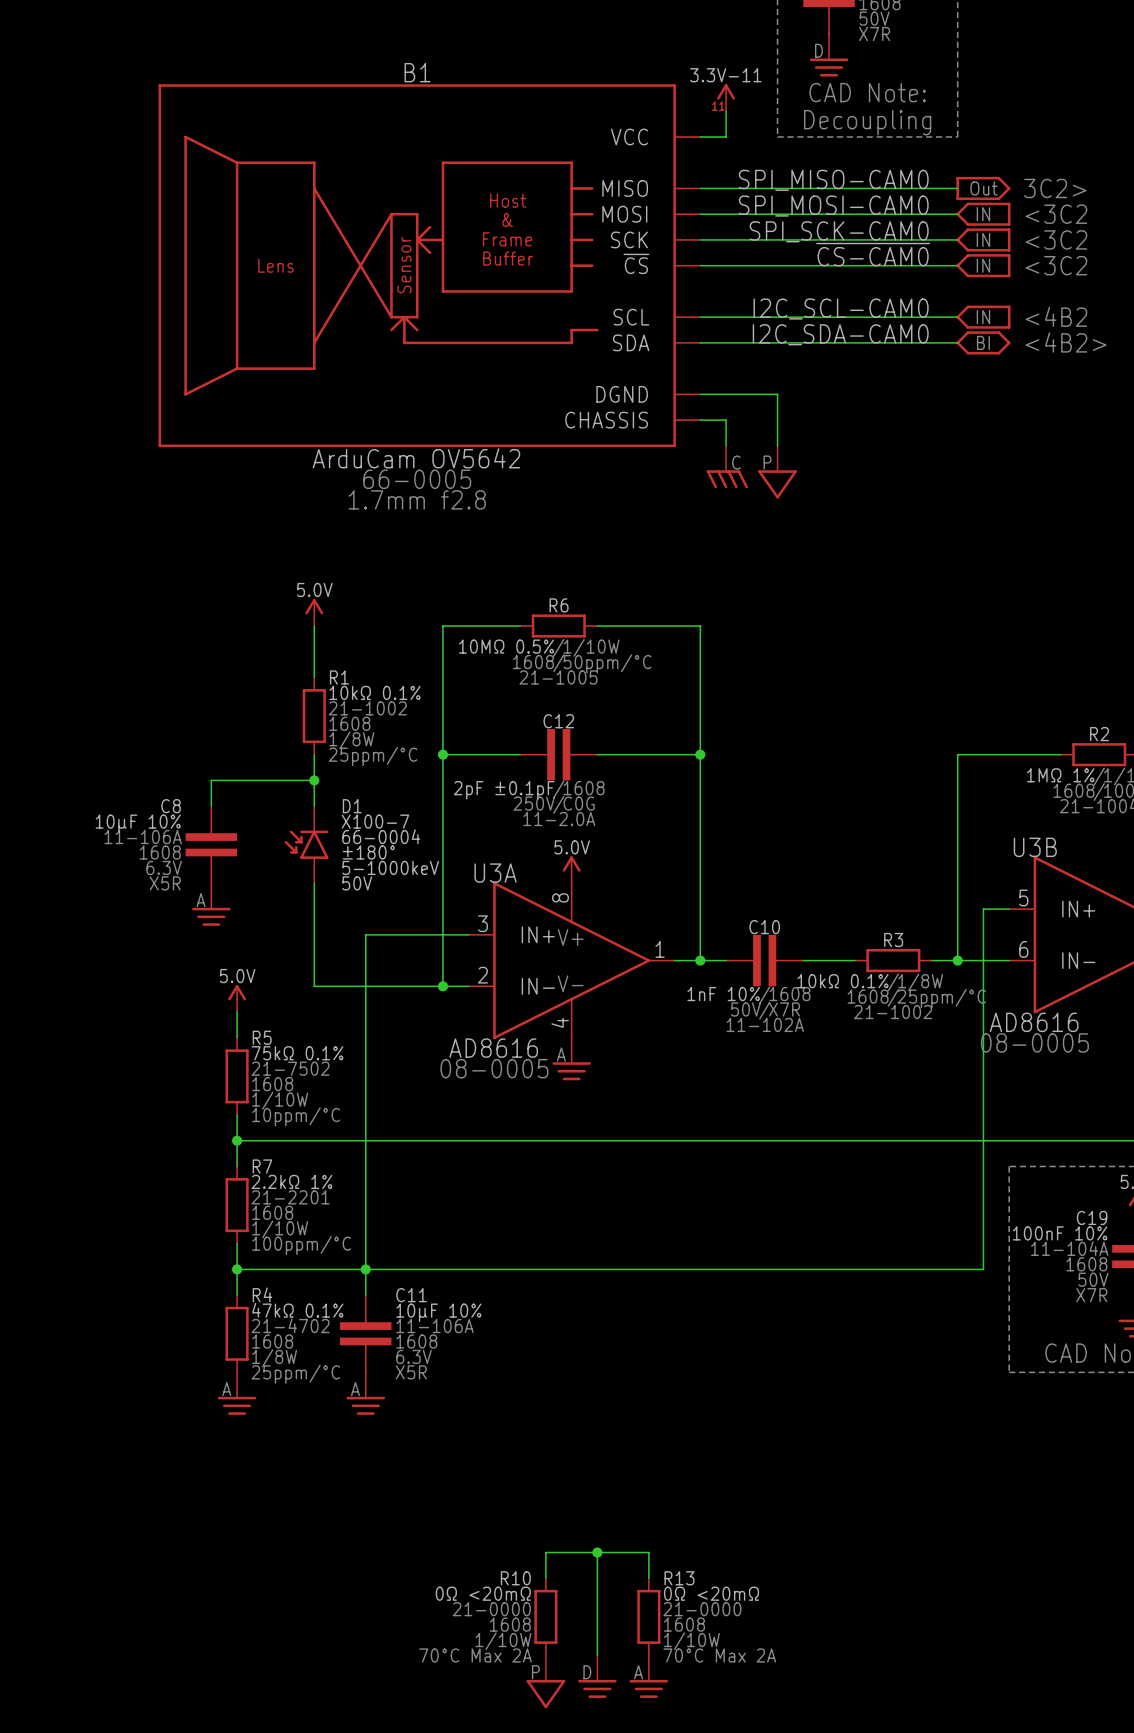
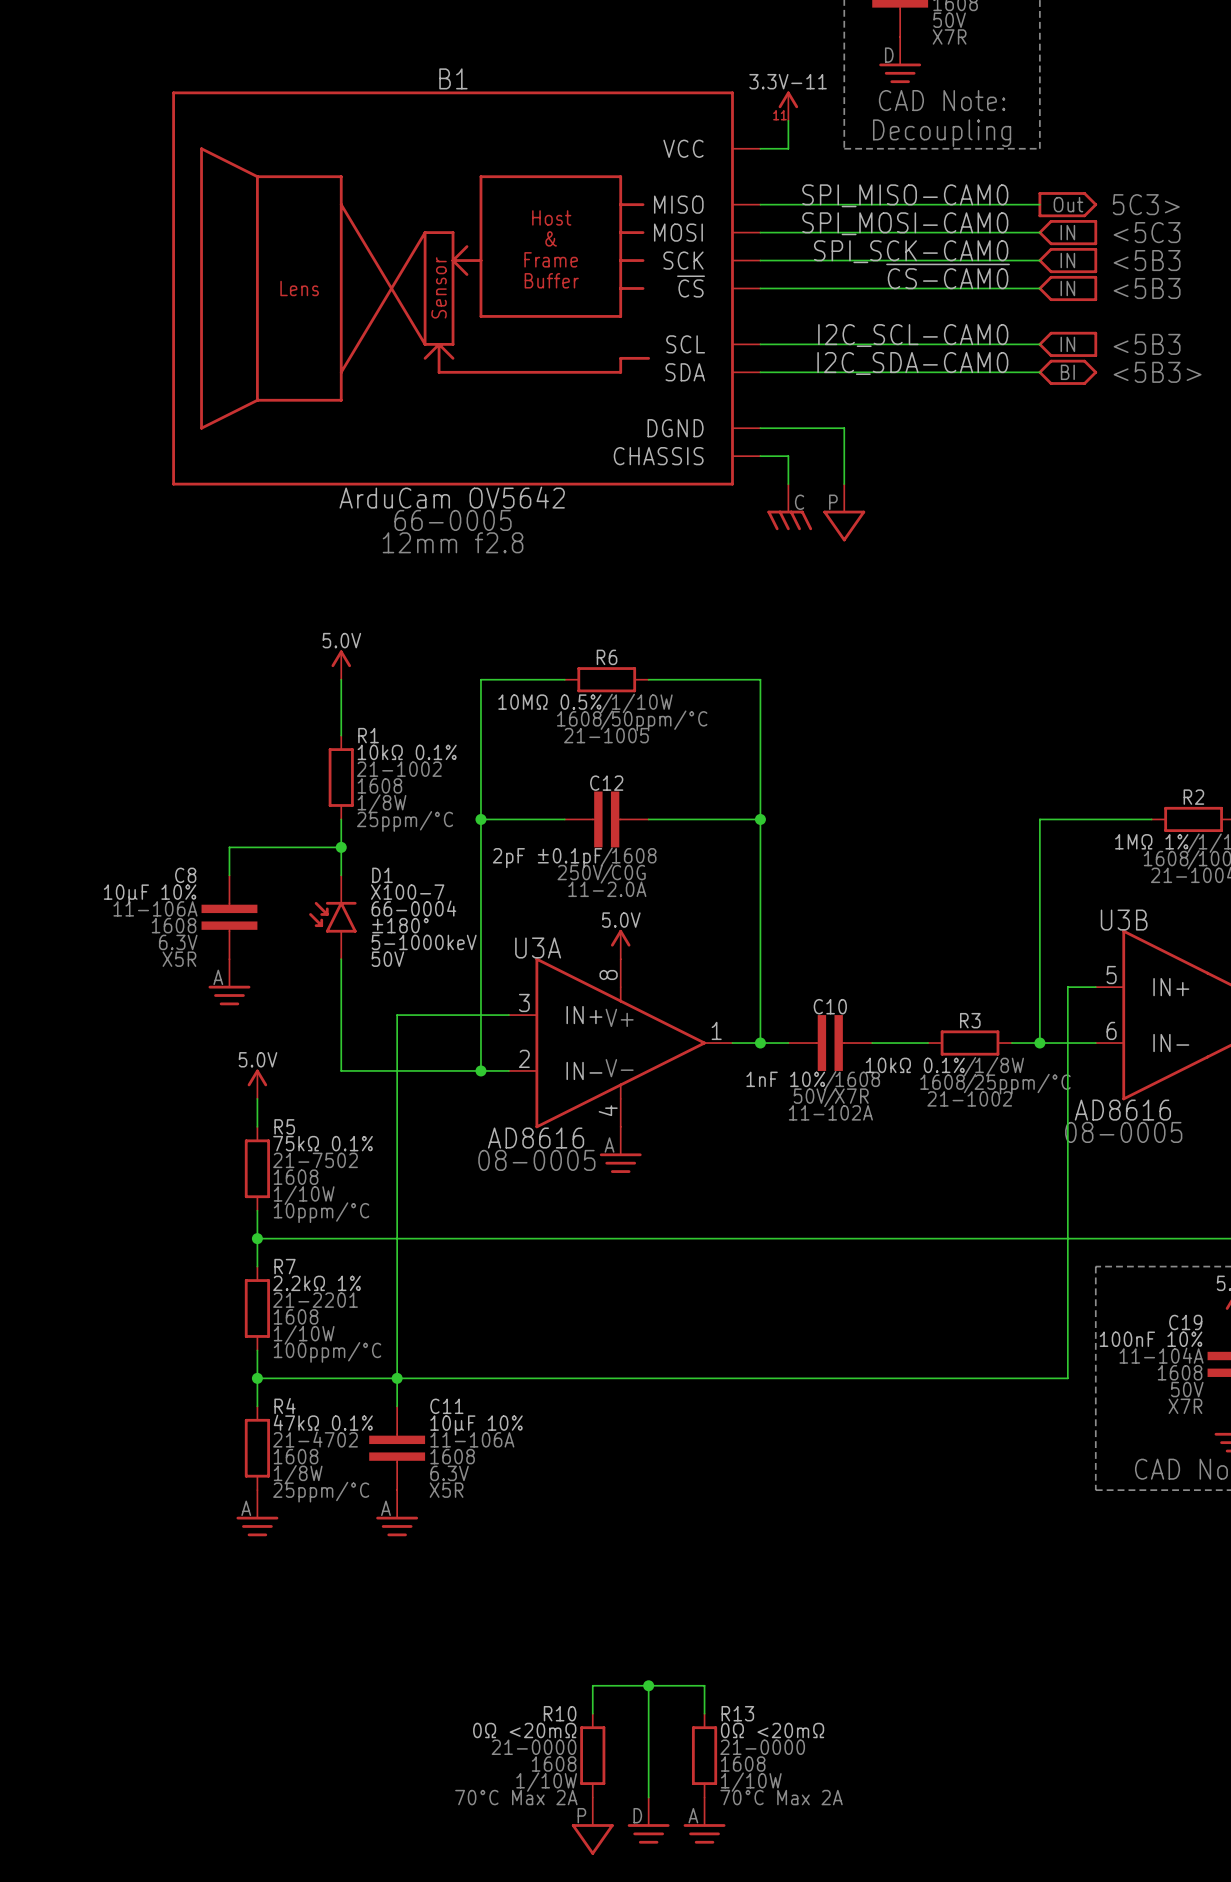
text: 3C2> (1055, 188) -> 5C3> (1146, 204)
text: <3C2 (1056, 214) -> <5C3 (1147, 232)
text: <3C2 (1056, 239) -> <5B3 (1147, 260)
text: <3C2 (1056, 265) -> <5B3 (1147, 288)
text: <4B2 (1056, 316) -> <5B3 (1147, 344)
text: <4B2> (1066, 342) -> <5B3> (1157, 372)
B1 text: 1.7mm f2.8 (417, 499) -> 12mm f2.8 (453, 542)

